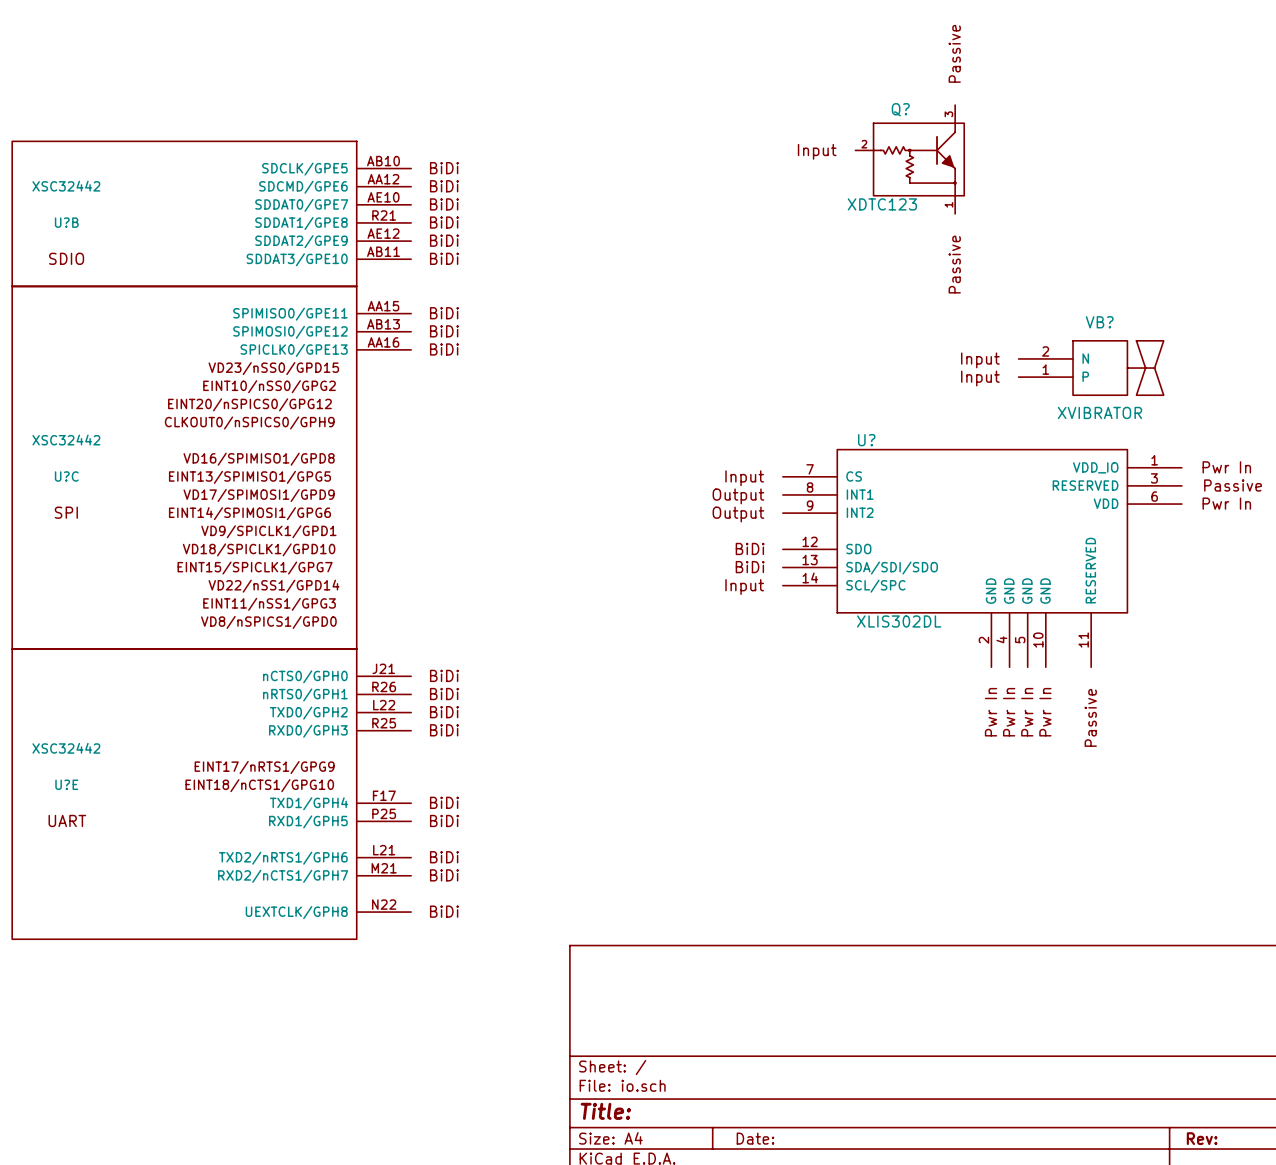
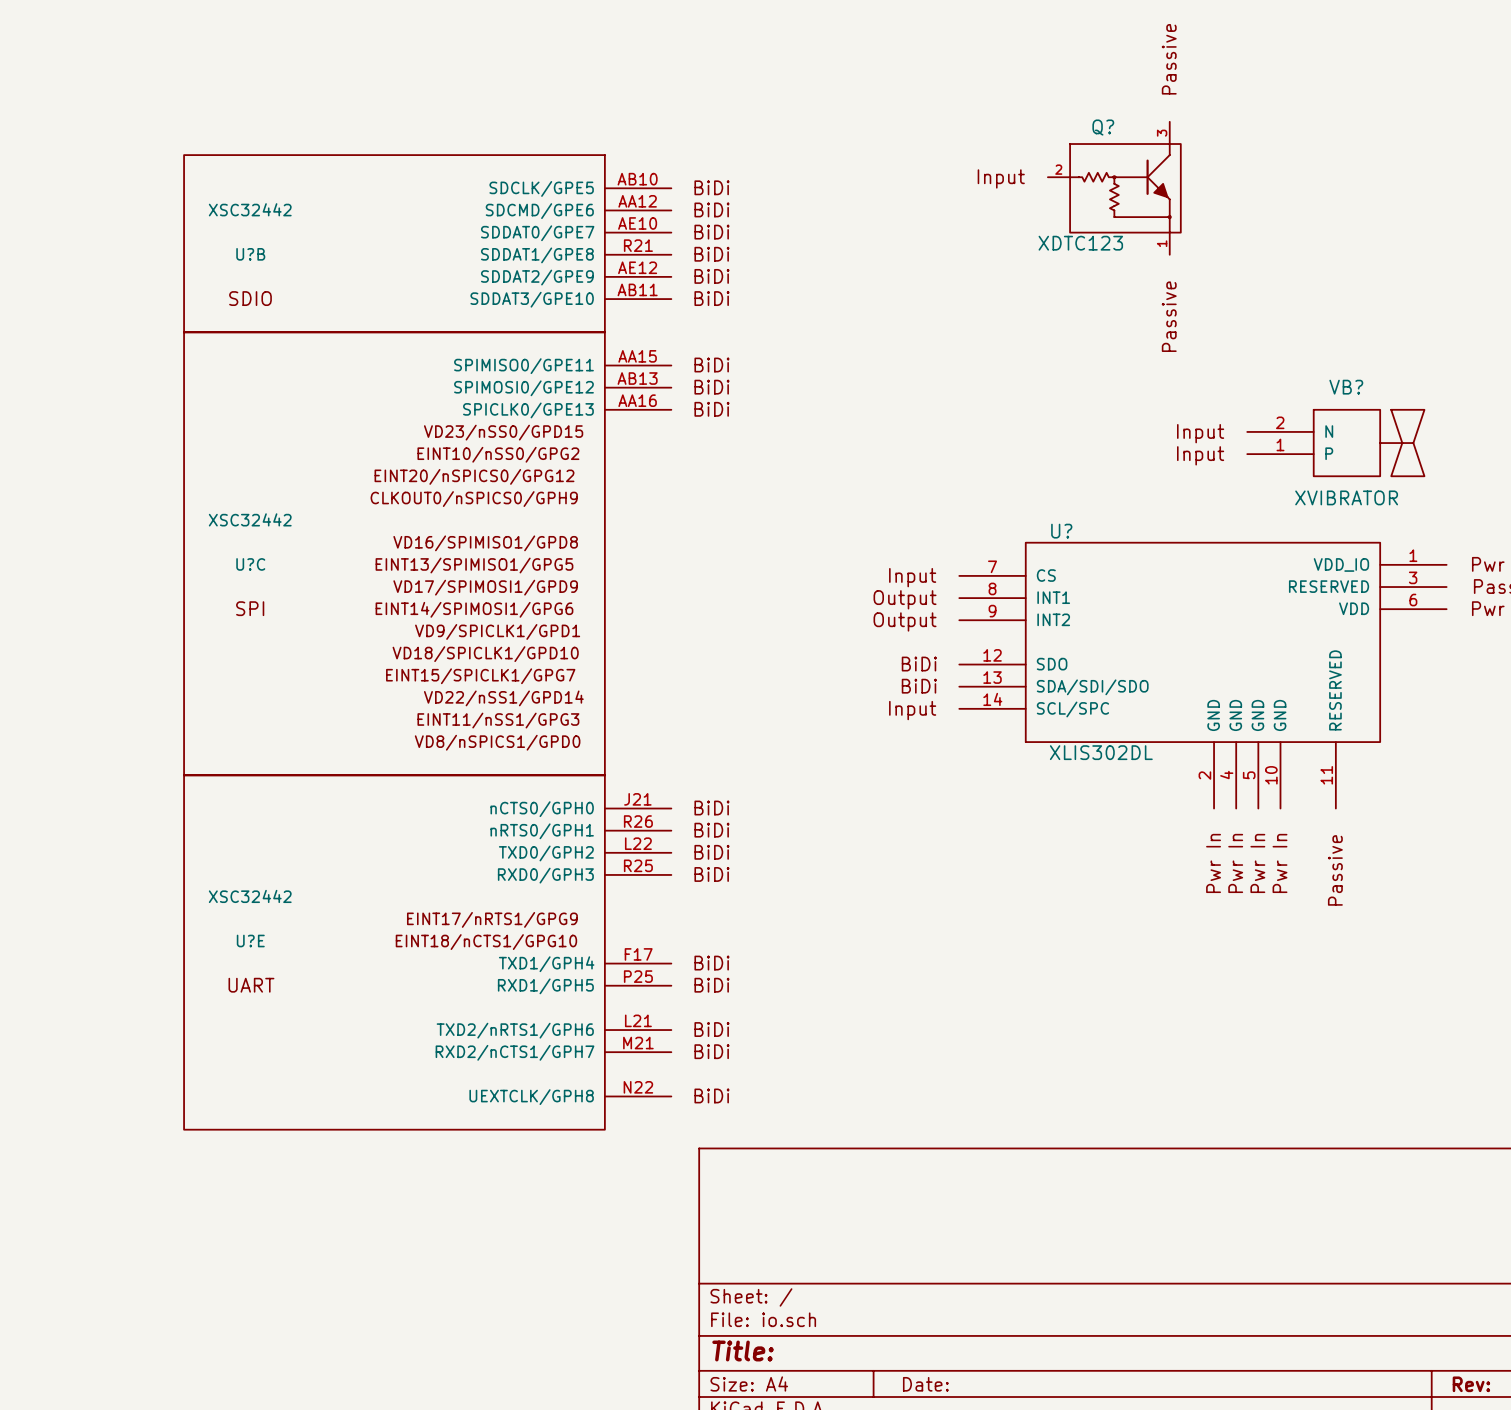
U?B position: (211, 213) -> (427, 243)
U?C position: (211, 467) -> (427, 553)
U?E position: (211, 794) -> (427, 952)

